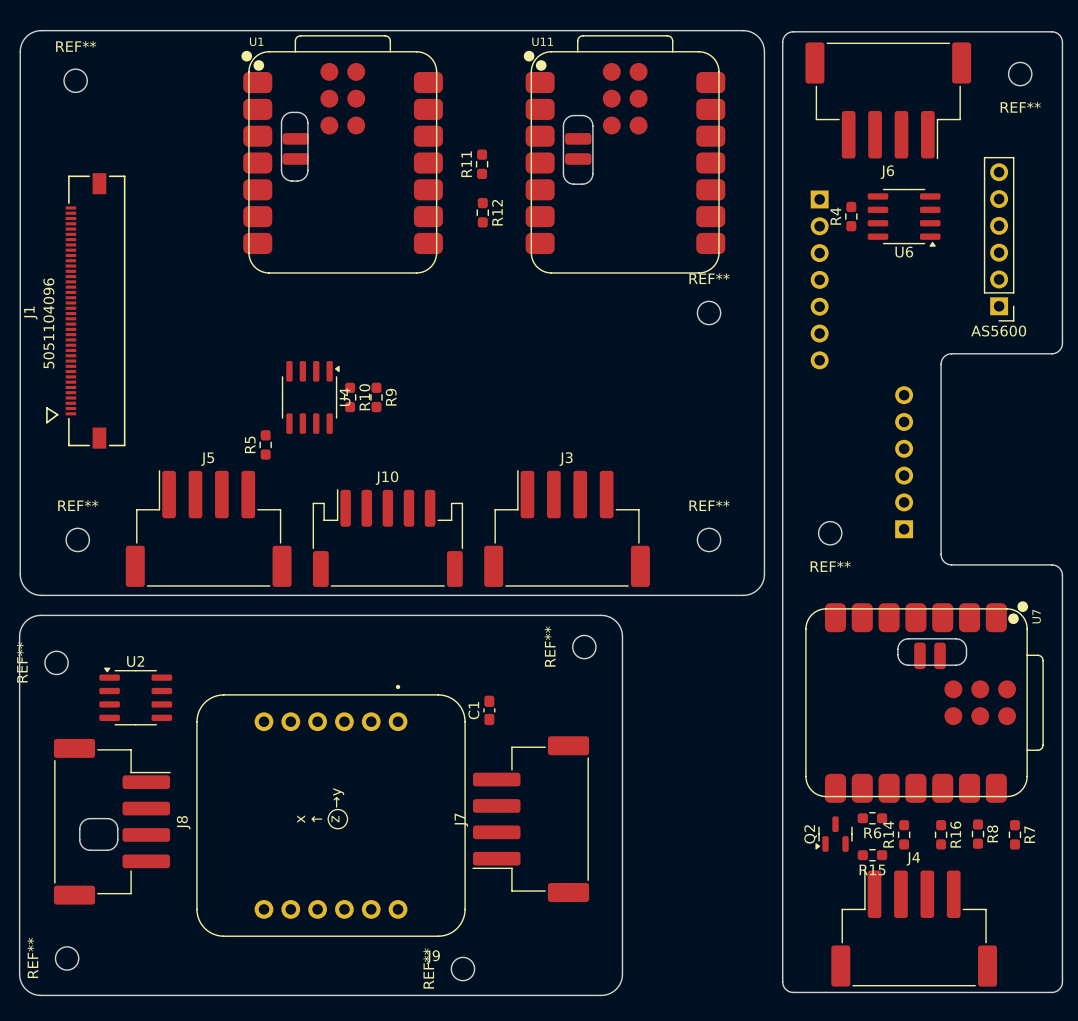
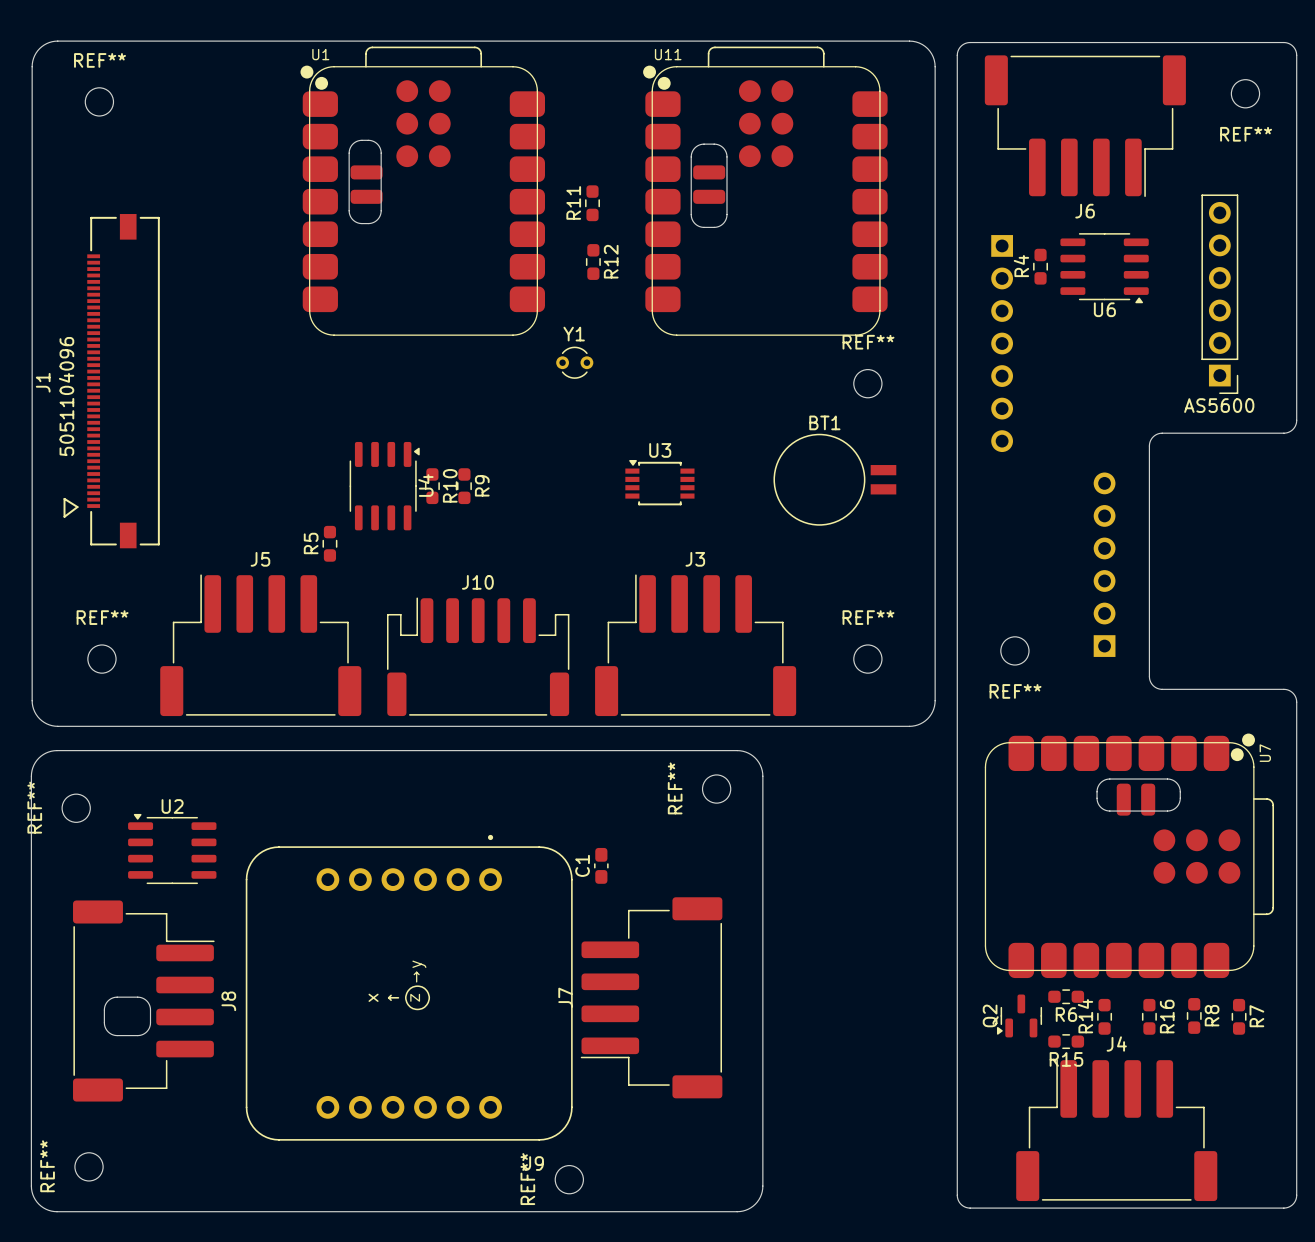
Y1: none -> (574, 362)
BT1: none -> (834, 479)
U3: none -> (659, 482)

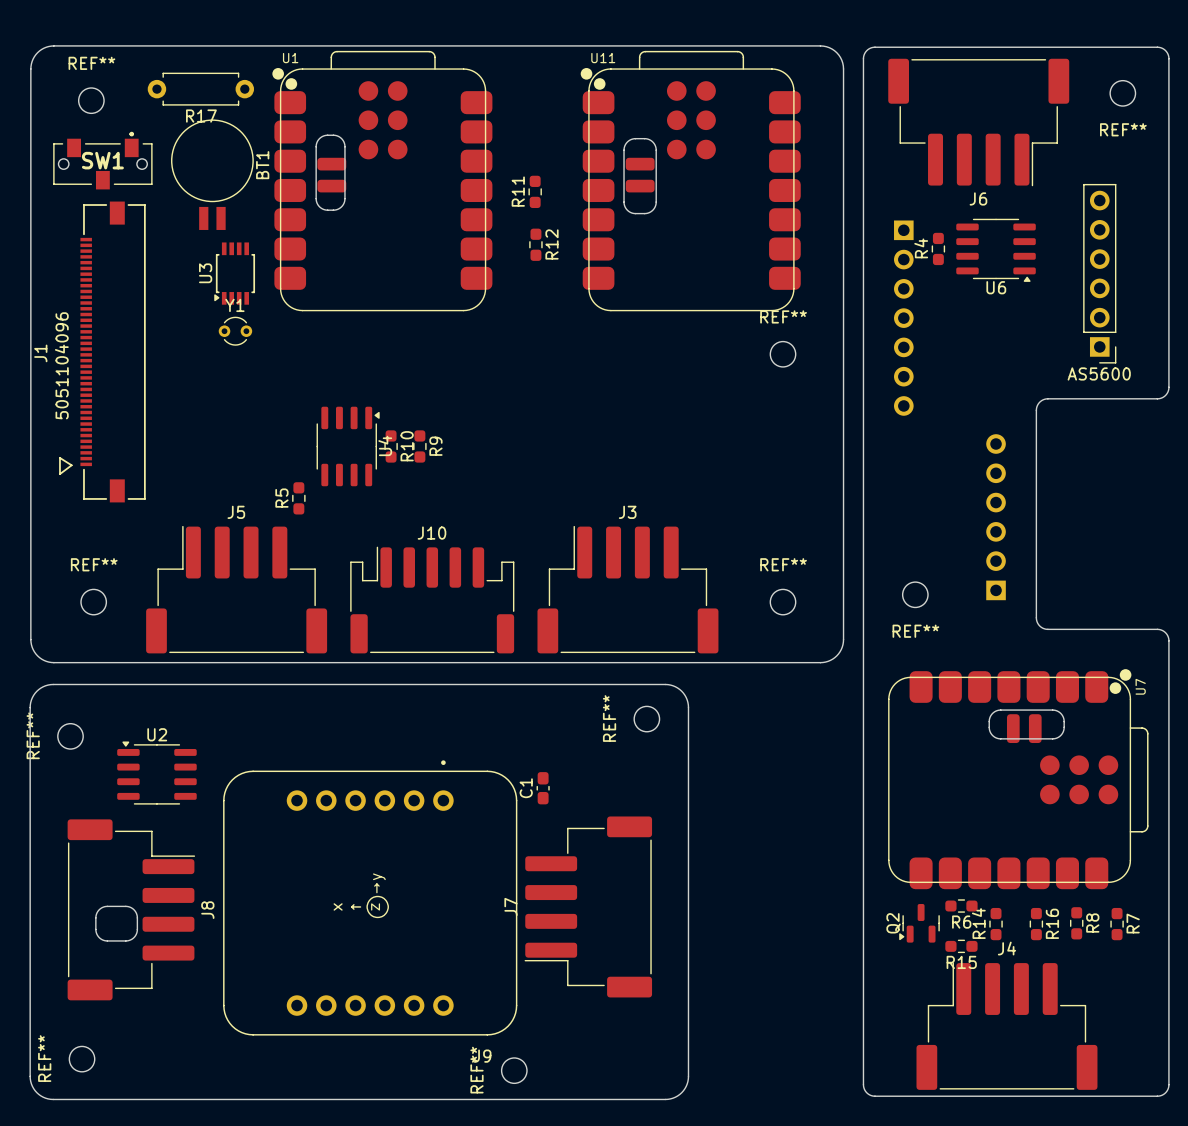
R17: none -> (200, 89)
SW1: none -> (102, 160)
Y1 position: (574, 362) -> (235, 331)
BT1 rotation: 0° (834, 479) -> 90° clockwise (212, 174)
BT1 position: (834, 479) -> (212, 174)
U3 rotation: 0° (659, 482) -> 90° counterclockwise (234, 273)
U3 position: (659, 482) -> (234, 273)

